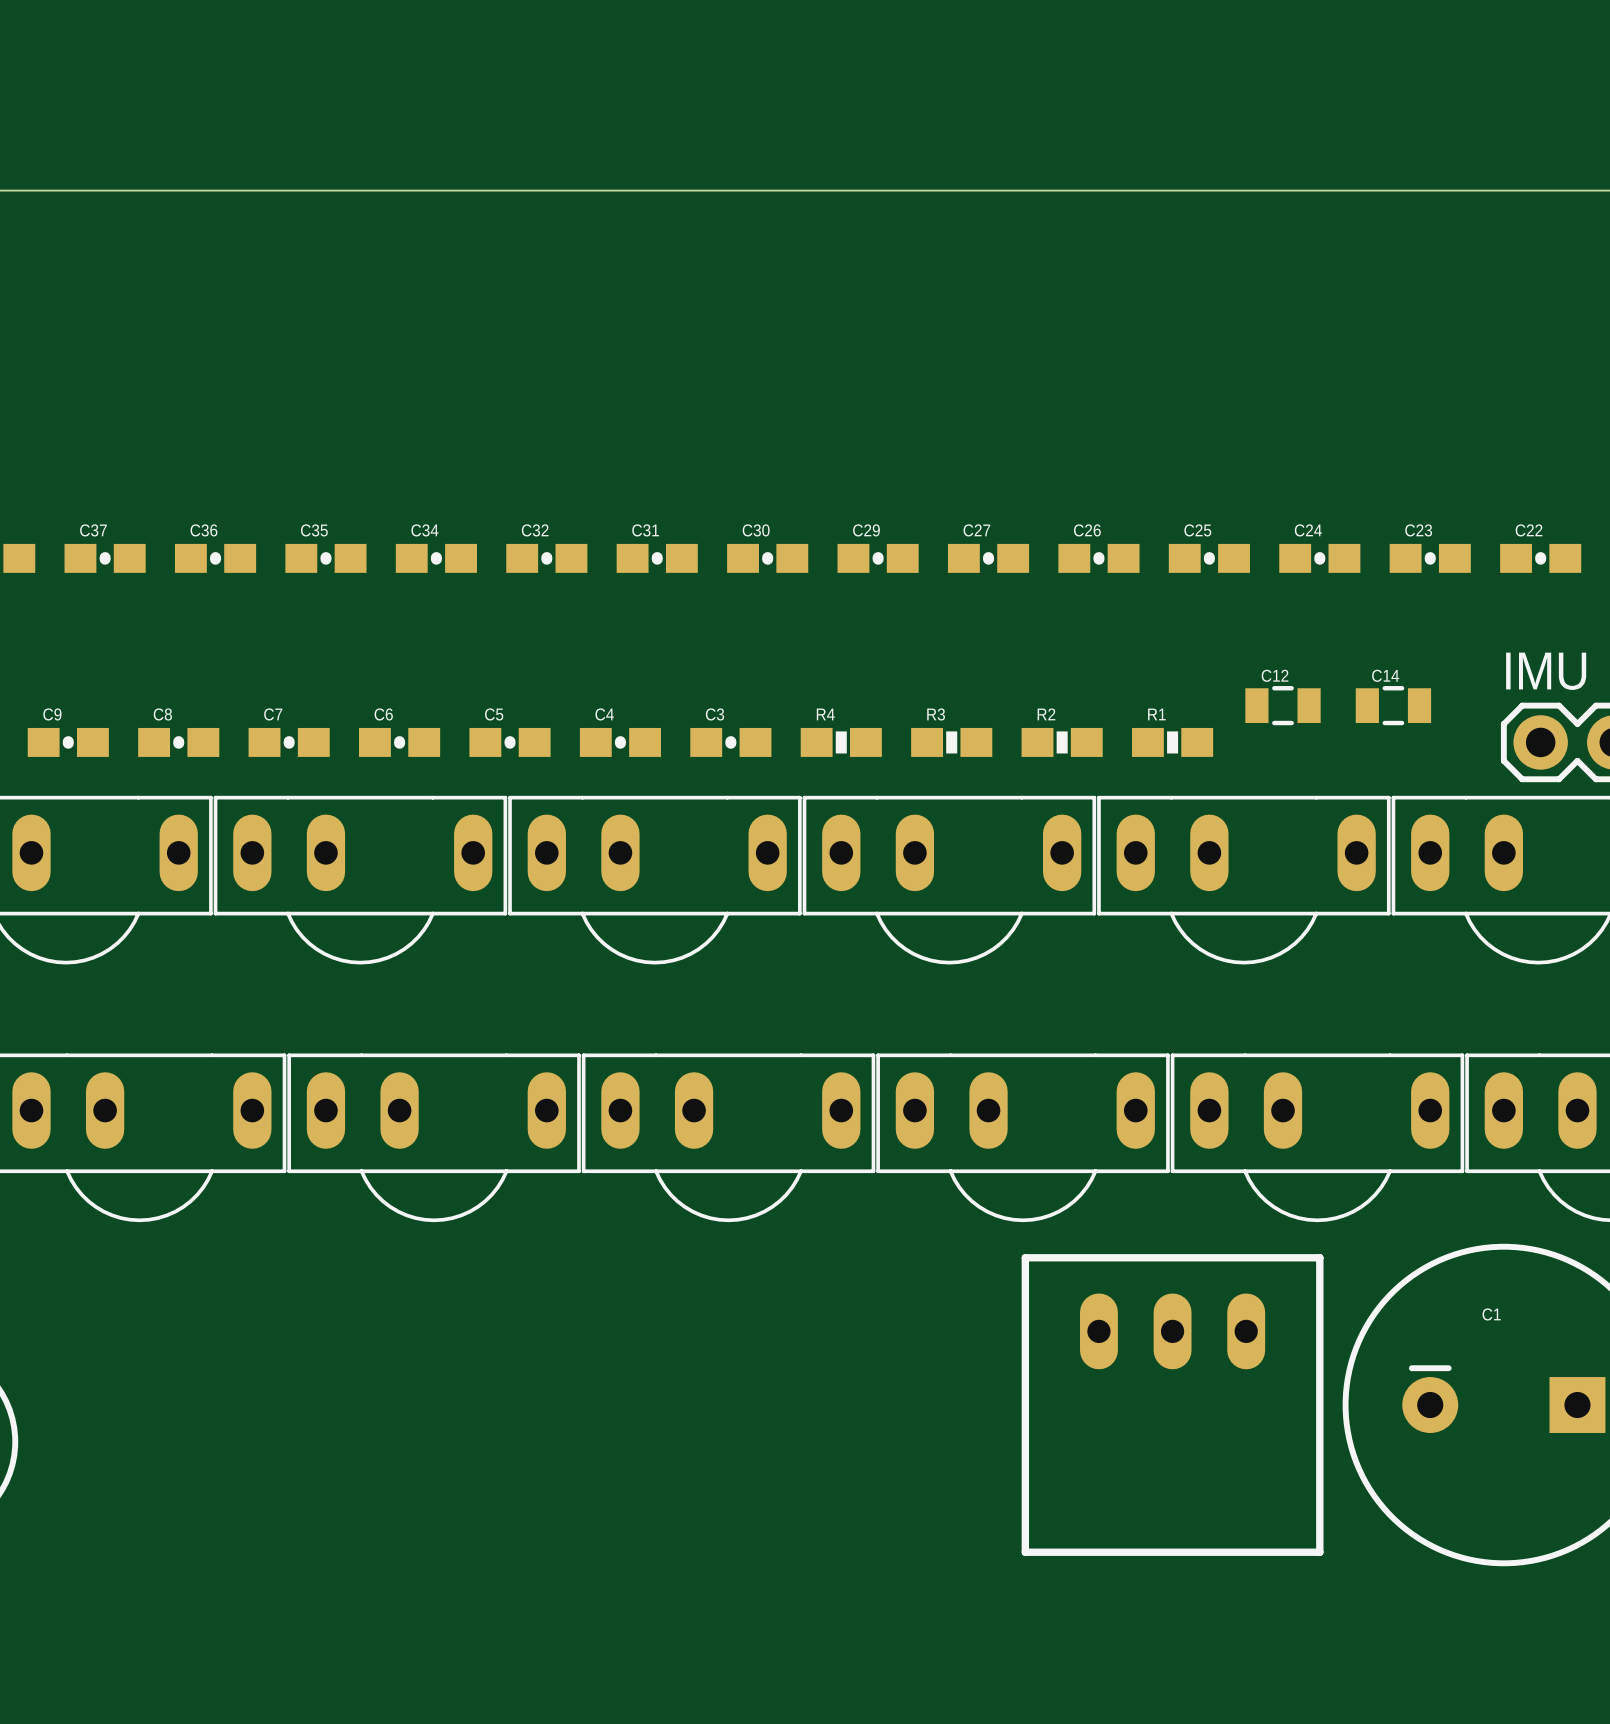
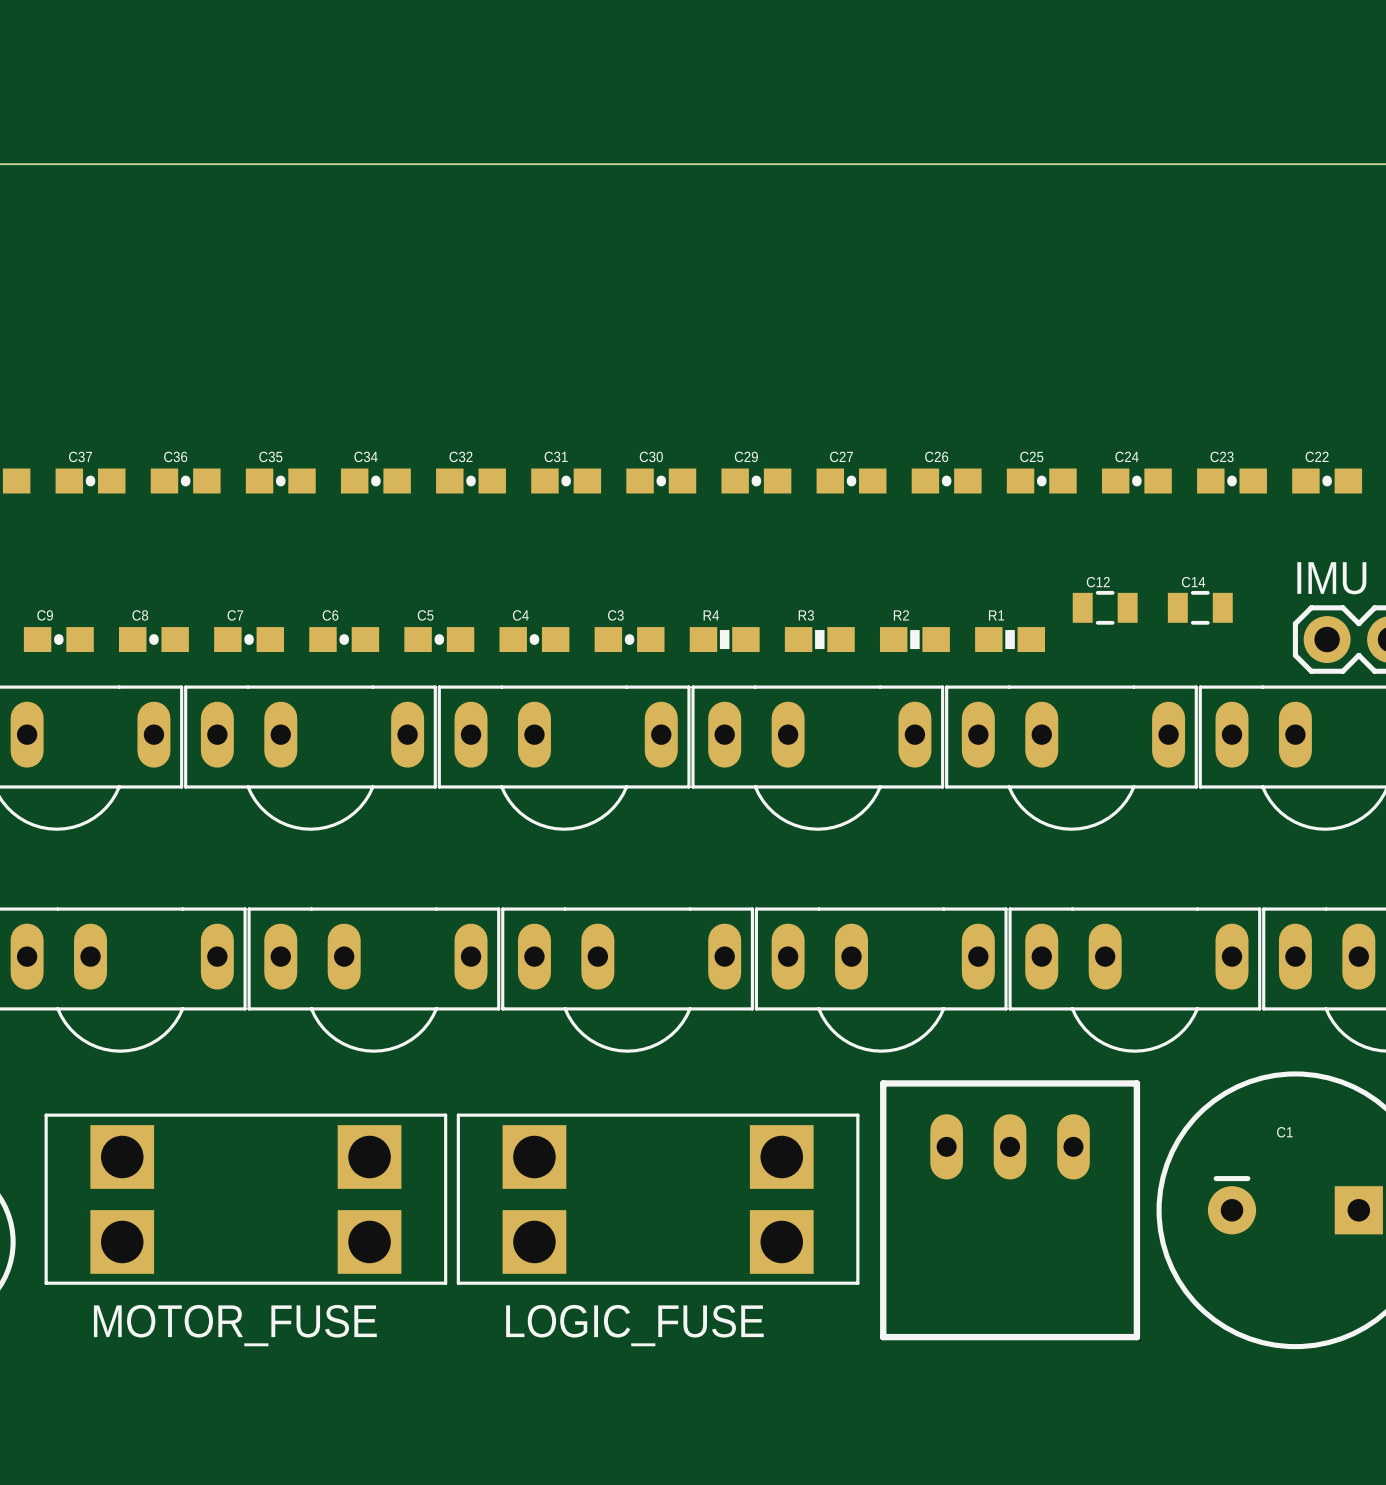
MOTOR_FUSE: none -> (245, 1199)
LOGIC_FUSE: none -> (658, 1199)

